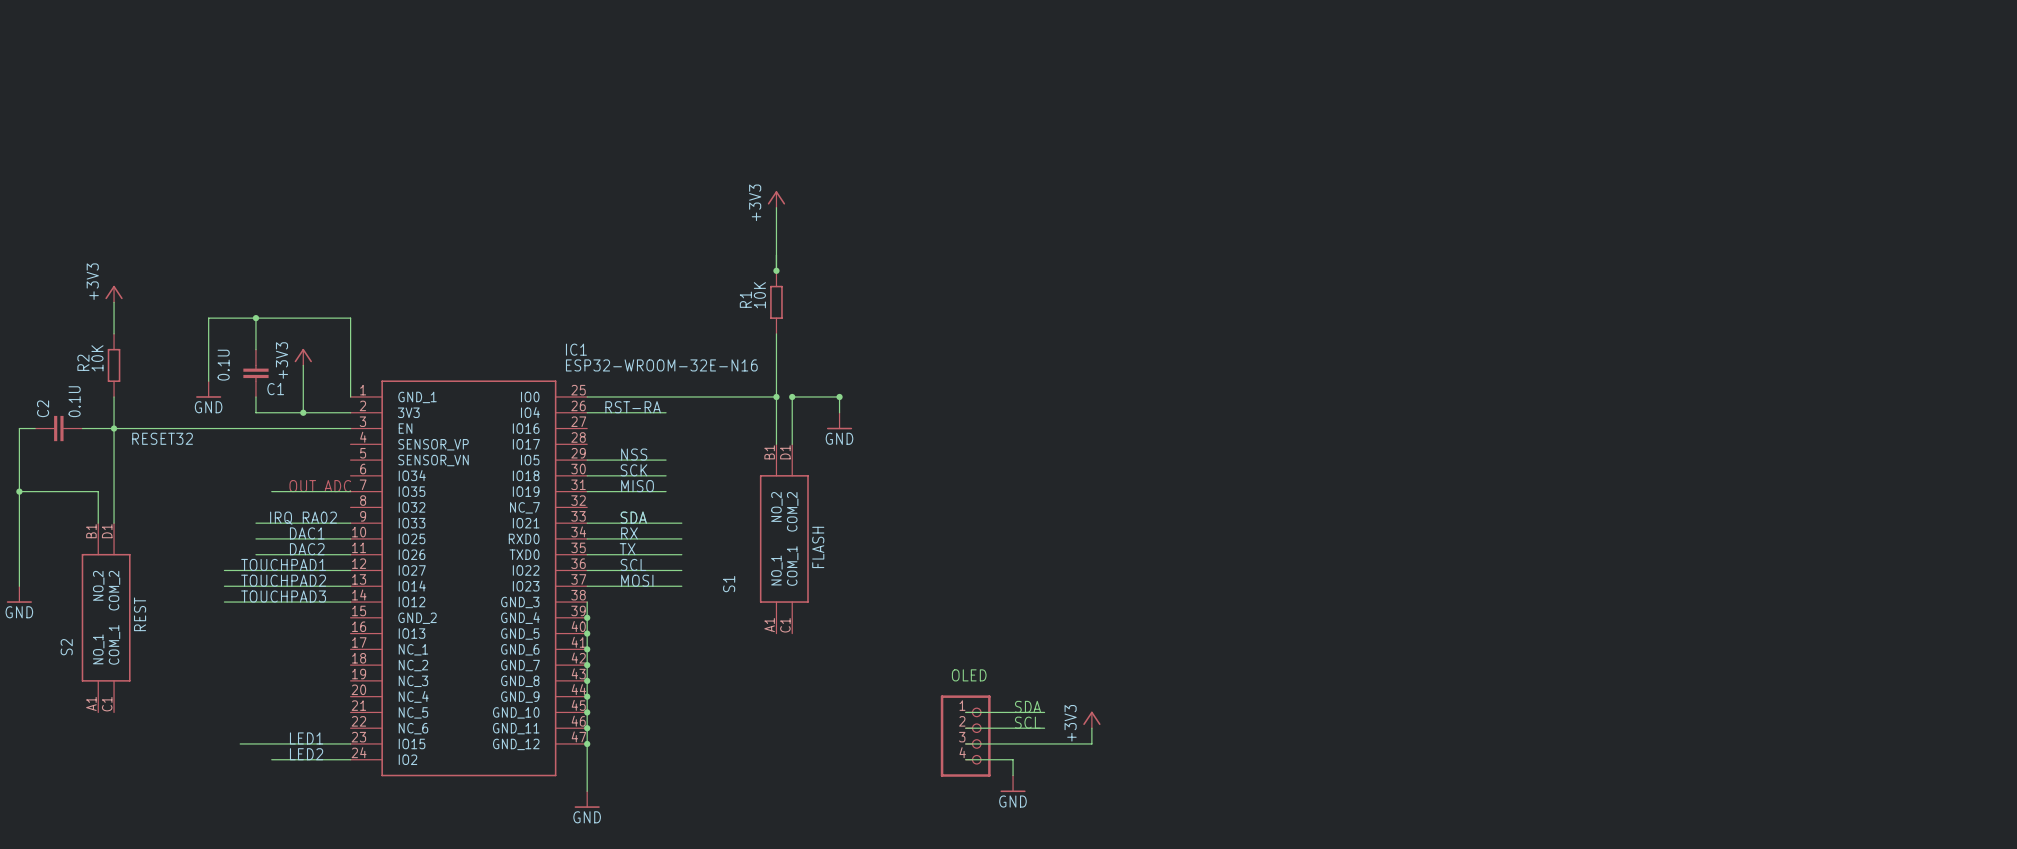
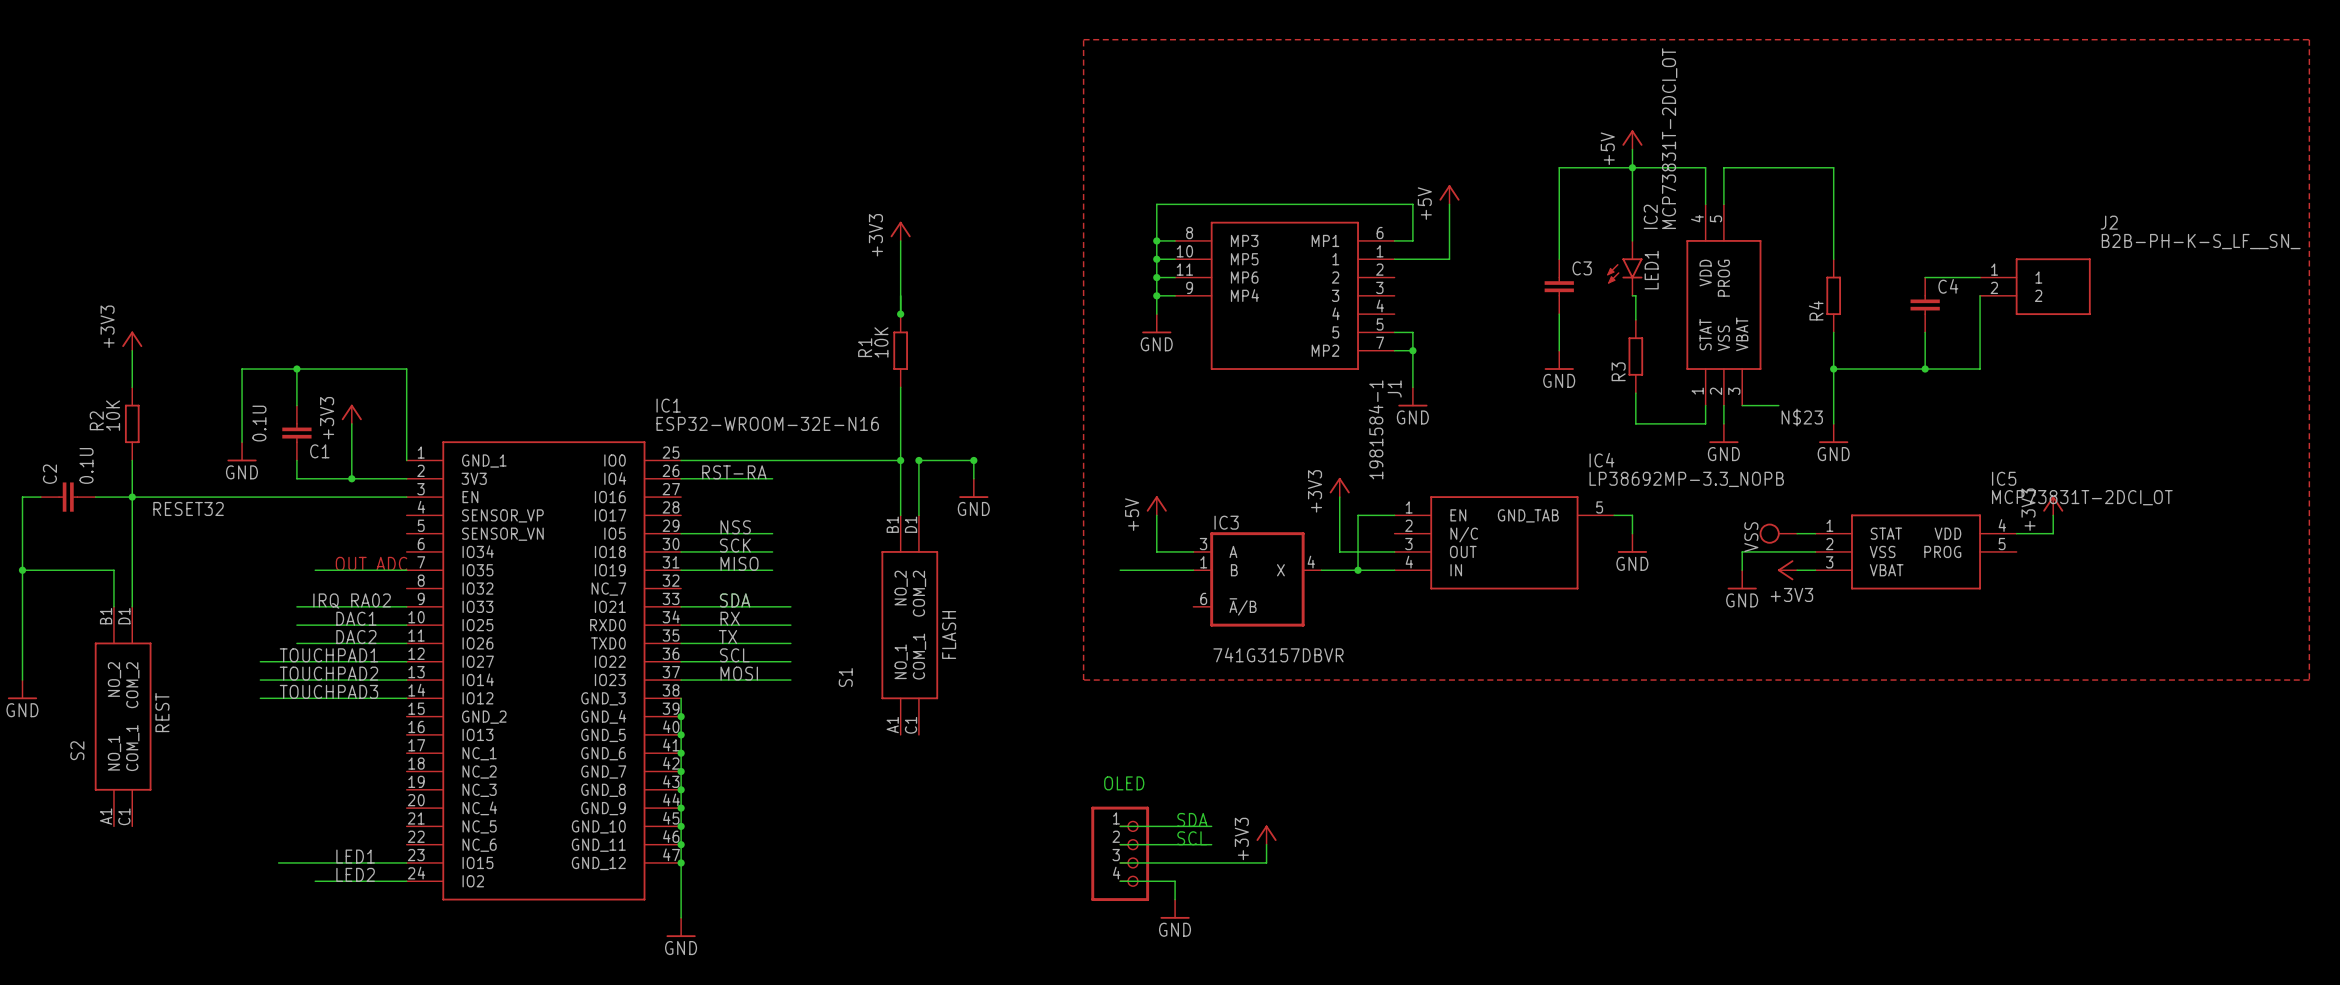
line: none -> (1083, 39) (2309, 39) (2309, 680) (1083, 680) (1083, 39)
power symbol: none -> +5V (1632, 139)
wire: none -> (1632, 149) (1632, 240)
junction: none -> (1632, 167)
power symbol: none -> +5V (1449, 194)
wire: none -> (1449, 204) (1449, 259) (1394, 259)
wire: none -> (1705, 204) (1705, 167) (1559, 167) (1559, 259)
wire: none -> (1723, 204) (1723, 167) (1833, 167) (1833, 259)
wire: none -> (1156, 240) (1175, 240)
junction: none -> (1156, 240)
wire: none -> (1394, 240) (1412, 240) (1412, 204) (1156, 204) (1156, 314)
wire: none -> (1156, 259) (1175, 259)
junction: none -> (1156, 259)
LED1: none -> (1624, 268)
wire: none -> (1156, 277) (1175, 277)
junction: none -> (1156, 277)
wire: none -> (1925, 277) (1980, 277)
C3: none -> (1559, 286)
J2: none -> B2B-PH-K-S_LF__SN_ (2035, 286)
wire: none -> (1156, 295) (1175, 295)
junction: none -> (1156, 295)
J1: none -> 1981584-1 (1284, 295)
wire: none -> (1632, 295) (1635, 295) (1635, 319)
R4: none -> (1833, 295)
wire: none -> (1980, 295) (1980, 369) (1833, 369)
IC2: none -> MCP73831T-2DCI_OT (1723, 304)
C4: none -> (1925, 304)
wire: none -> (1559, 314) (1559, 350)
power symbol: none -> GND (1156, 323)
wire: none -> (1394, 332) (1412, 332) (1412, 387)
wire: none -> (1833, 332) (1833, 423)
wire: none -> (1925, 332) (1925, 369)
wire: none -> (1394, 350) (1412, 350)
junction: none -> (1412, 350)
R3: none -> (1635, 356)
power symbol: none -> GND (1559, 360)
junction: none -> (1833, 369)
junction: none -> (1925, 369)
wire: none -> (1635, 393) (1635, 423) (1705, 423) (1705, 405)
power symbol: none -> GND (1412, 396)
wire: none -> (1723, 405) (1723, 423)
wire: none -> (1742, 405) (1778, 405)
label: none -> N$23 (1802, 417)
power symbol: none -> GND (1723, 433)
power symbol: none -> GND (1833, 433)
power symbol: none -> +3V3 (1339, 487)
wire: none -> (1339, 497) (1339, 551) (1394, 551)
power symbol: none -> +5V (1156, 505)
power symbol: none -> +3V3 (2053, 505)
wire: none -> (1156, 515) (1156, 551) (1193, 551)
wire: none -> (1394, 515) (1358, 515) (1358, 570)
wire: none -> (1614, 515) (1632, 515) (1632, 533)
wire: none -> (2053, 515) (2053, 533) (2016, 533)
power symbol: none -> VSS (1778, 533)
wire: none -> (1797, 533) (1815, 533)
IC4: none -> LP38692MP-3.3_NOPB (1504, 542)
power symbol: none -> GND (1632, 543)
wire: none -> (1815, 551) (1742, 551) (1742, 570)
IC5: none -> MCP73831T-2DCI_OT (1916, 551)
wire: none -> (1120, 570) (1193, 570)
wire: none -> (1321, 570) (1394, 570)
junction: none -> (1358, 570)
power symbol: none -> +3V3 (1787, 570)
wire: none -> (1797, 570) (1815, 570)
IC3: none -> 741G3157DBVR (1257, 579)
power symbol: none -> GND (1742, 579)

